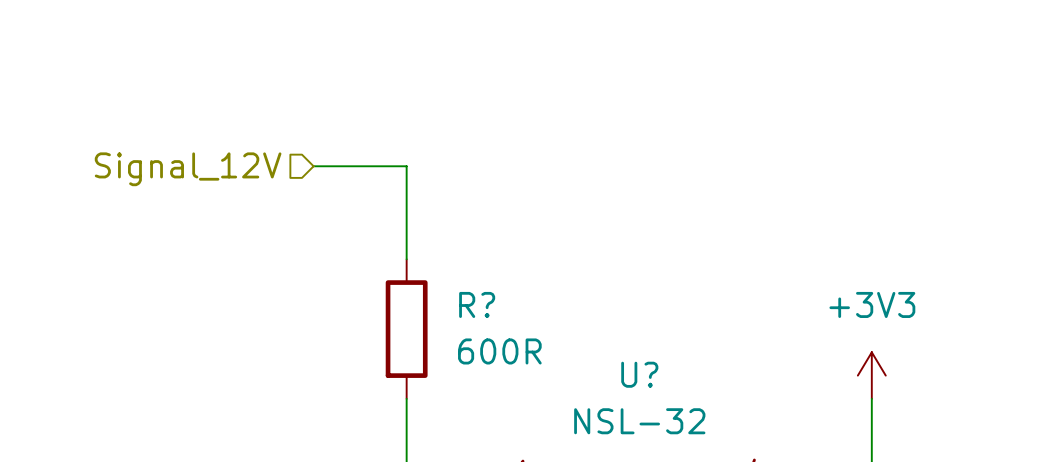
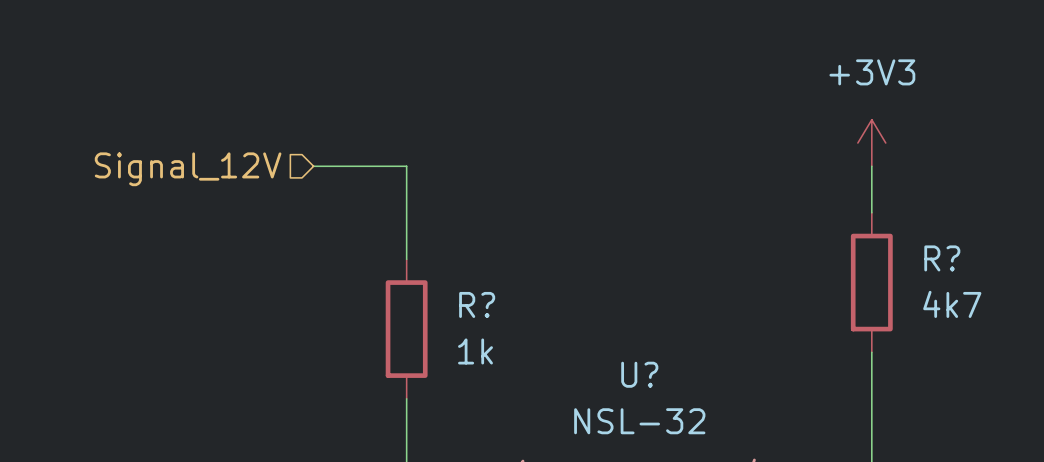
wire: none -> (871, 166) (871, 212)
R?: none -> 4k7 (871, 282)
R? value: 600R (499, 351) -> 1k (475, 351)
power symbol position: +3V3 (871, 375) -> +3V3 (871, 143)

